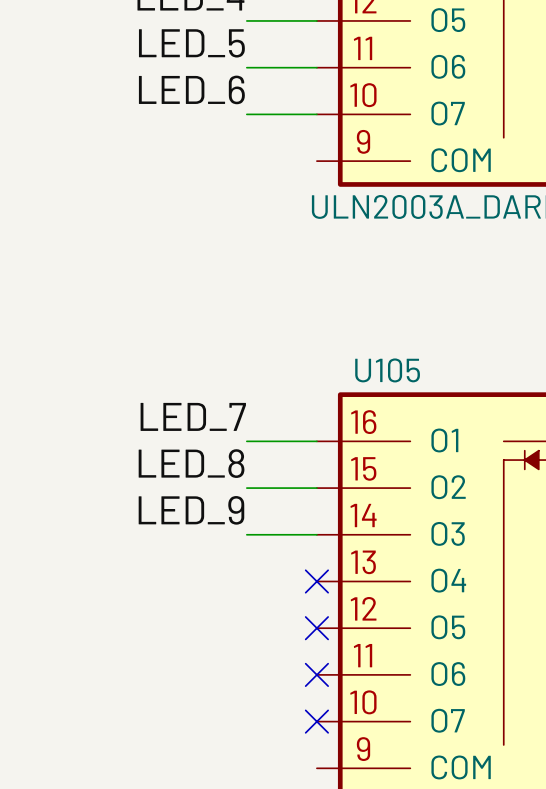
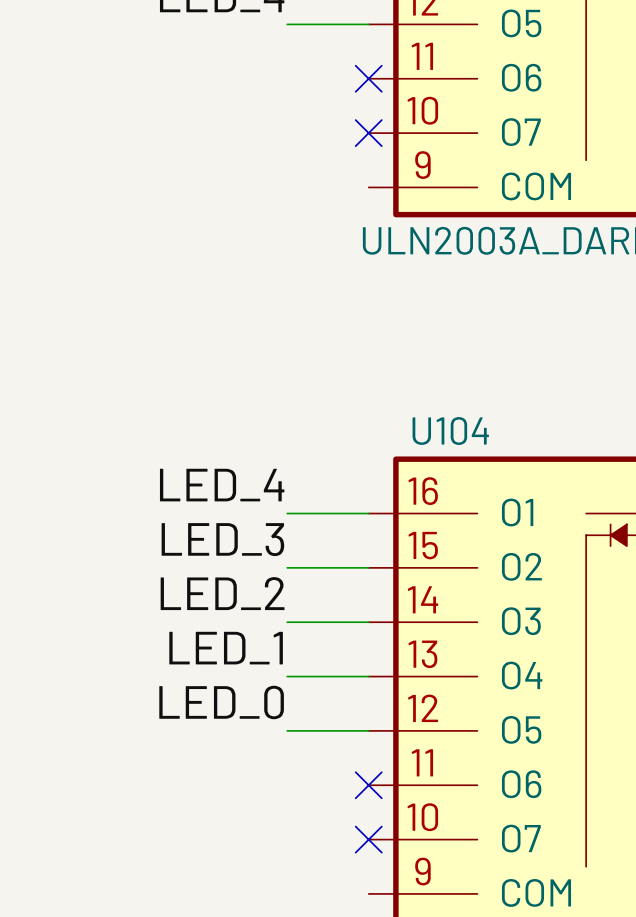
label: LED_5 (191, 43) -> none
wire: (246, 67) (316, 67) -> none
no-connect mark: none -> (368, 78)
label: LED_6 (191, 89) -> none
wire: (246, 114) (316, 114) -> none
no-connect mark: none -> (368, 133)
U105 name: U105 (387, 370) -> U104 (450, 431)
label: LED_7 (193, 416) -> LED_4 (222, 485)
label: LED_8 (191, 463) -> LED_3 (222, 539)
label: LED_9 (191, 510) -> LED_2 (222, 593)
label: none -> LED_1 (226, 648)
wire: none -> (287, 676) (368, 676)
no-connect mark: (316, 581) -> none
label: none -> LED_0 (221, 702)
wire: none -> (287, 730) (368, 730)
no-connect mark: (316, 628) -> none

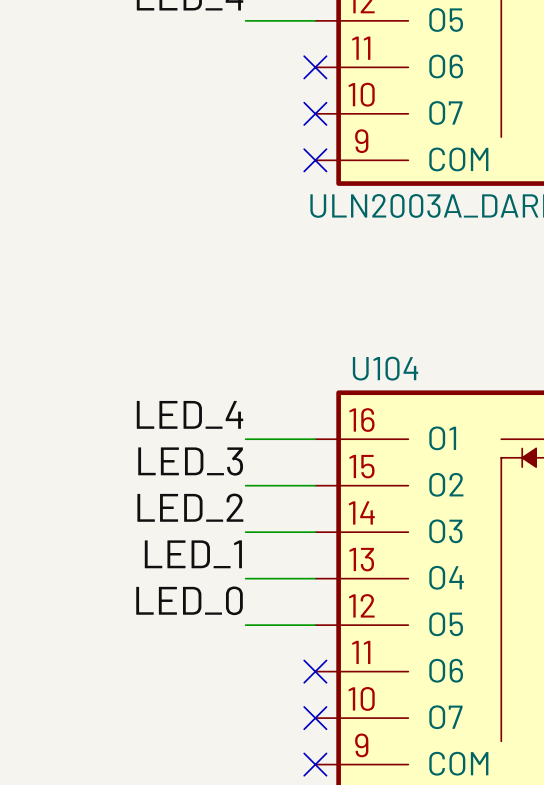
no-connect mark: none -> (315, 160)
no-connect mark: none -> (315, 764)

